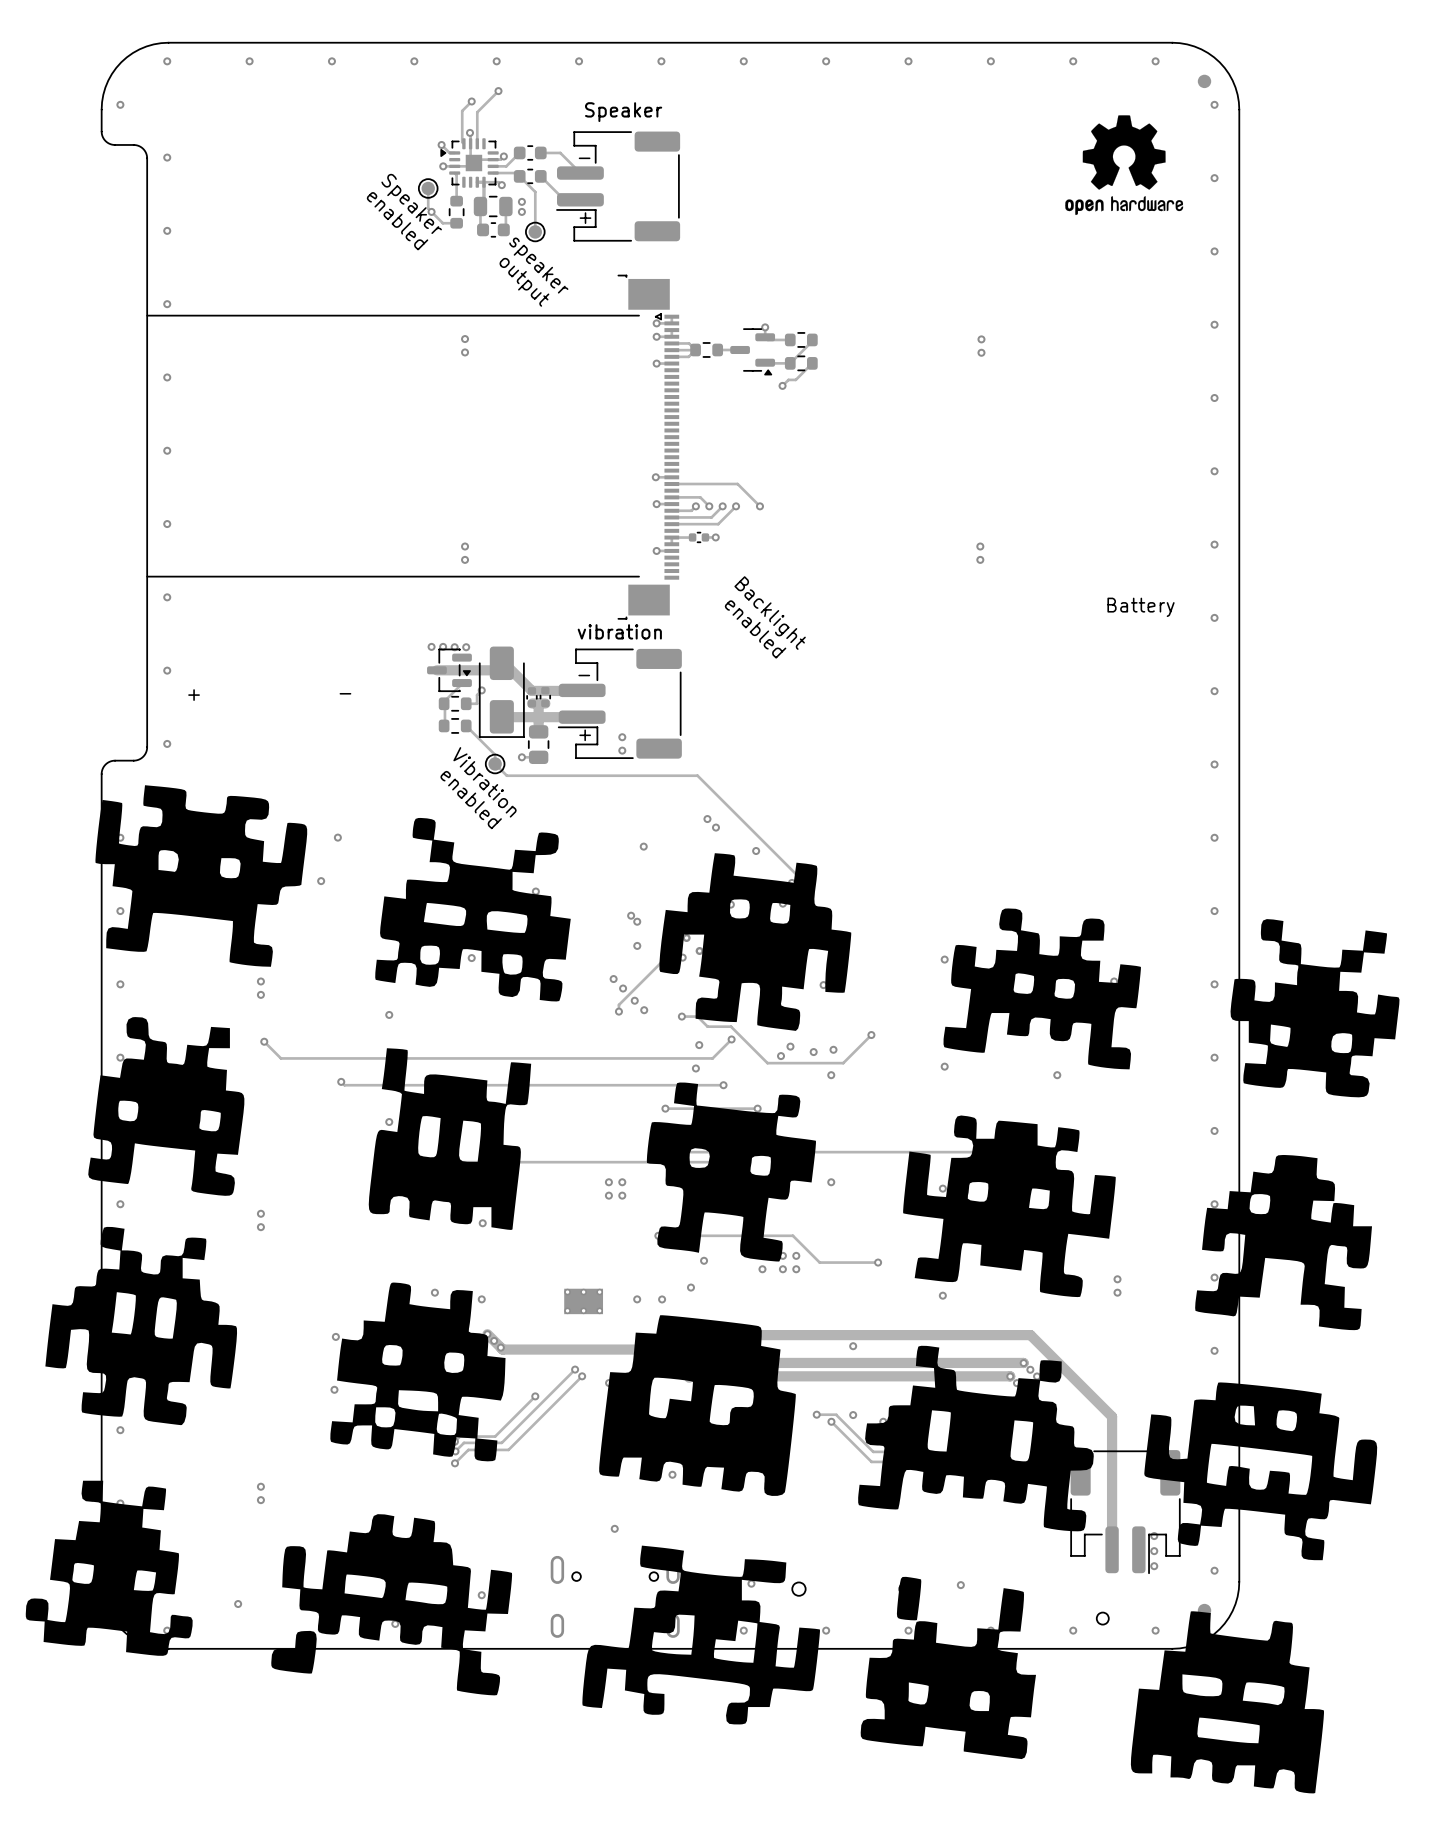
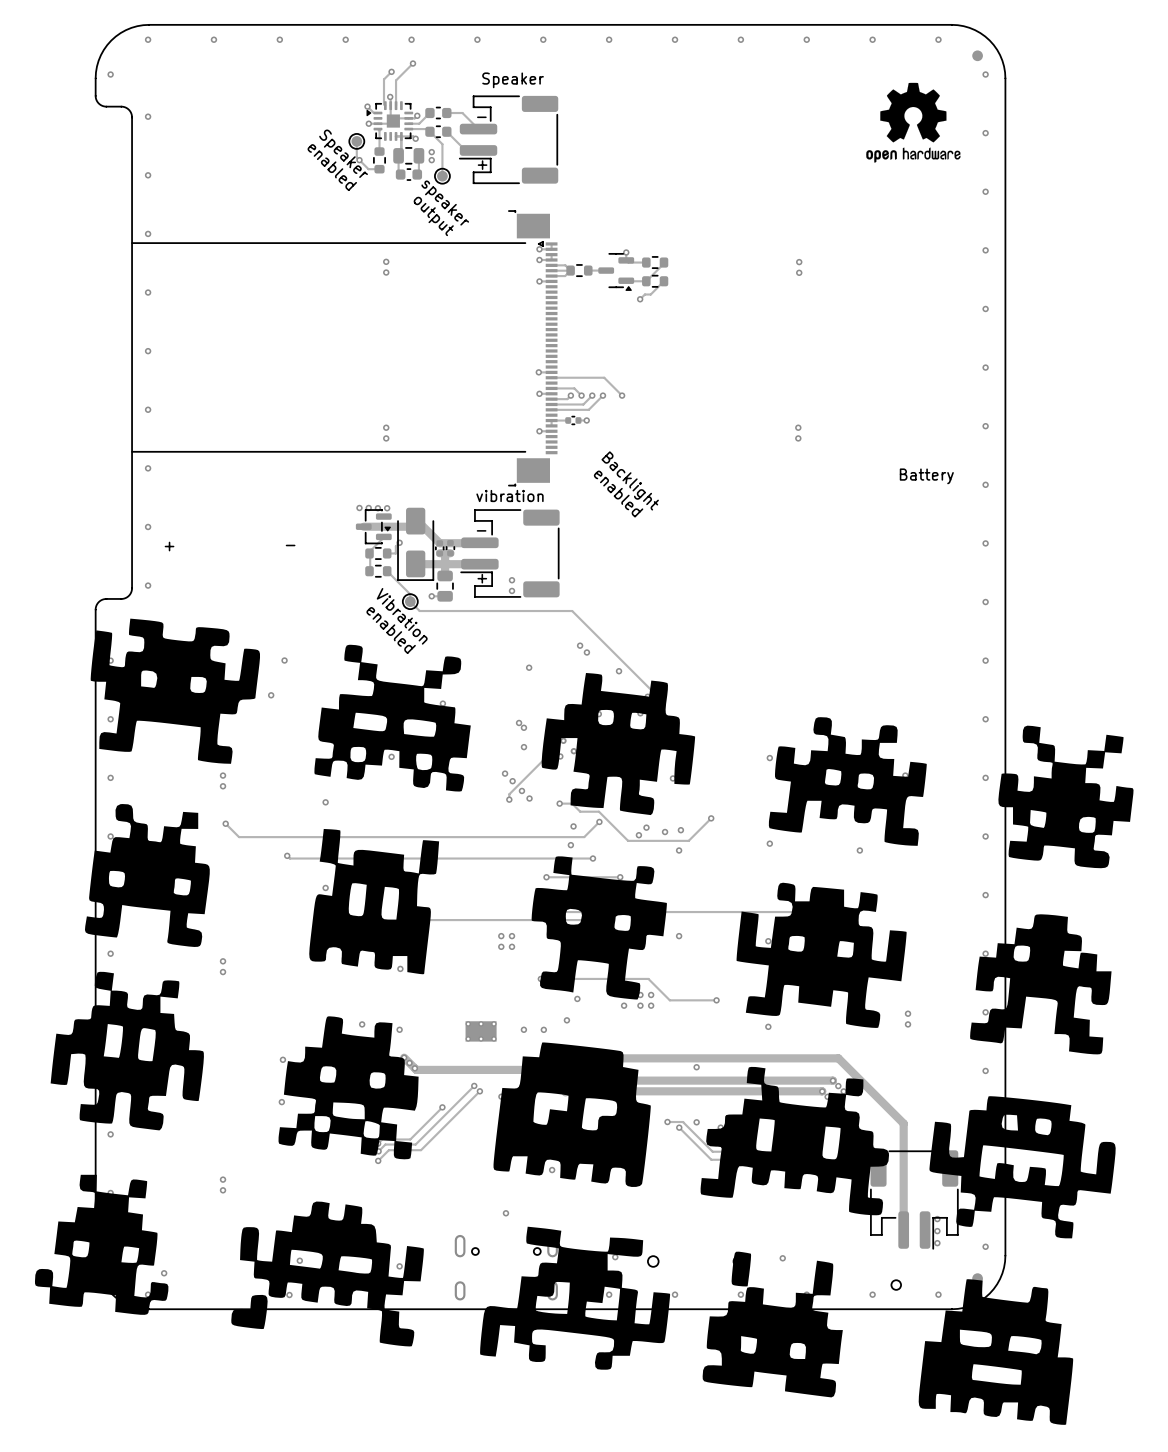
via: none -> (299, 1260)
via position: (238, 1604) -> (164, 1273)
via: (395, 1623) -> none
via: none -> (289, 1295)

